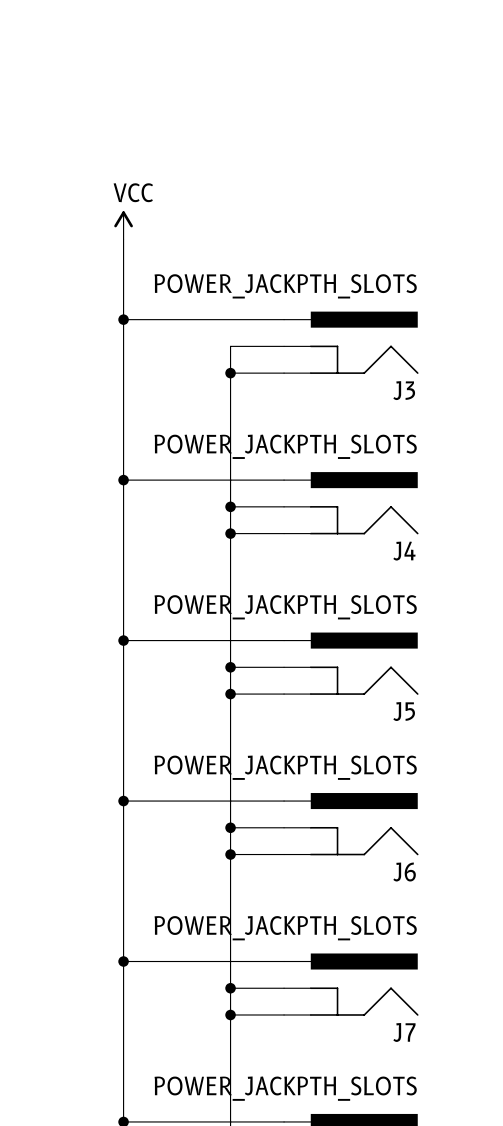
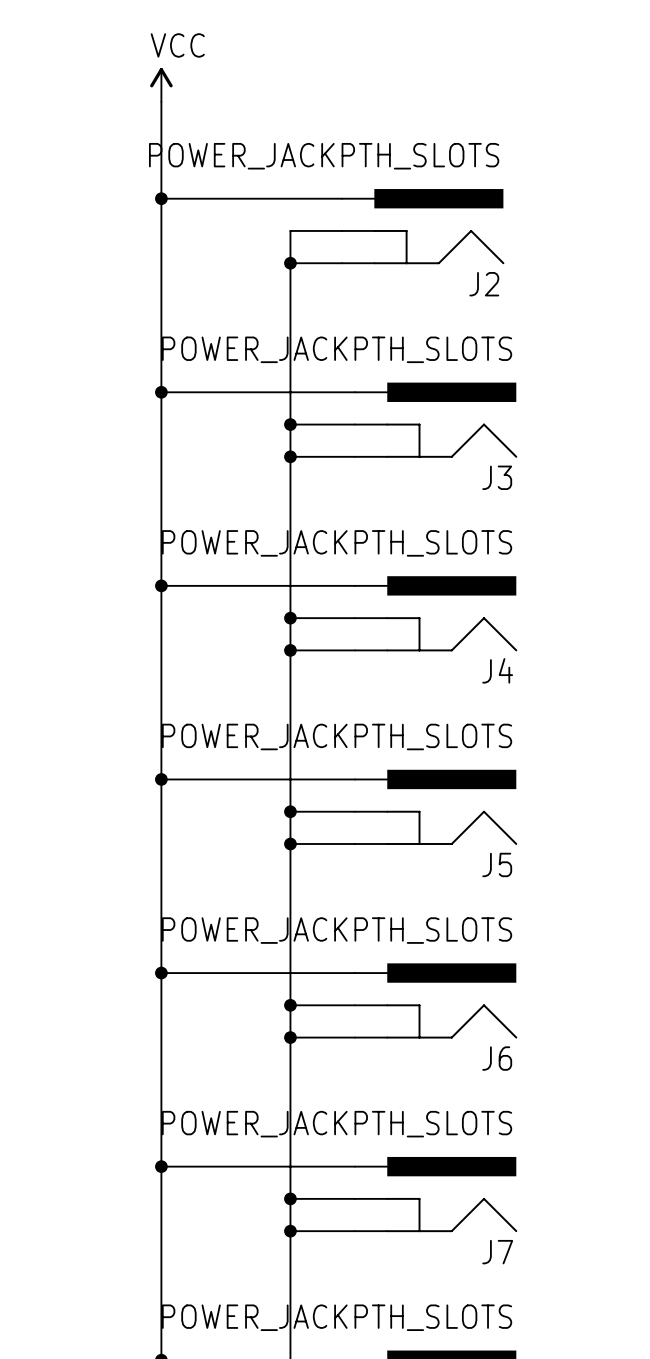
wire: none -> (161, 101) (161, 295)
wire: none -> (161, 198) (342, 198)
junction: none -> (161, 198)
J2: none -> POWER_JACKPTH_SLOTS (423, 226)
wire: none -> (342, 230) (290, 230) (290, 424)
wire: none -> (290, 263) (342, 263)
junction: none -> (290, 263)
power symbol position: VCC (123, 225) -> VCC (161, 84)
junction: none -> (290, 424)

